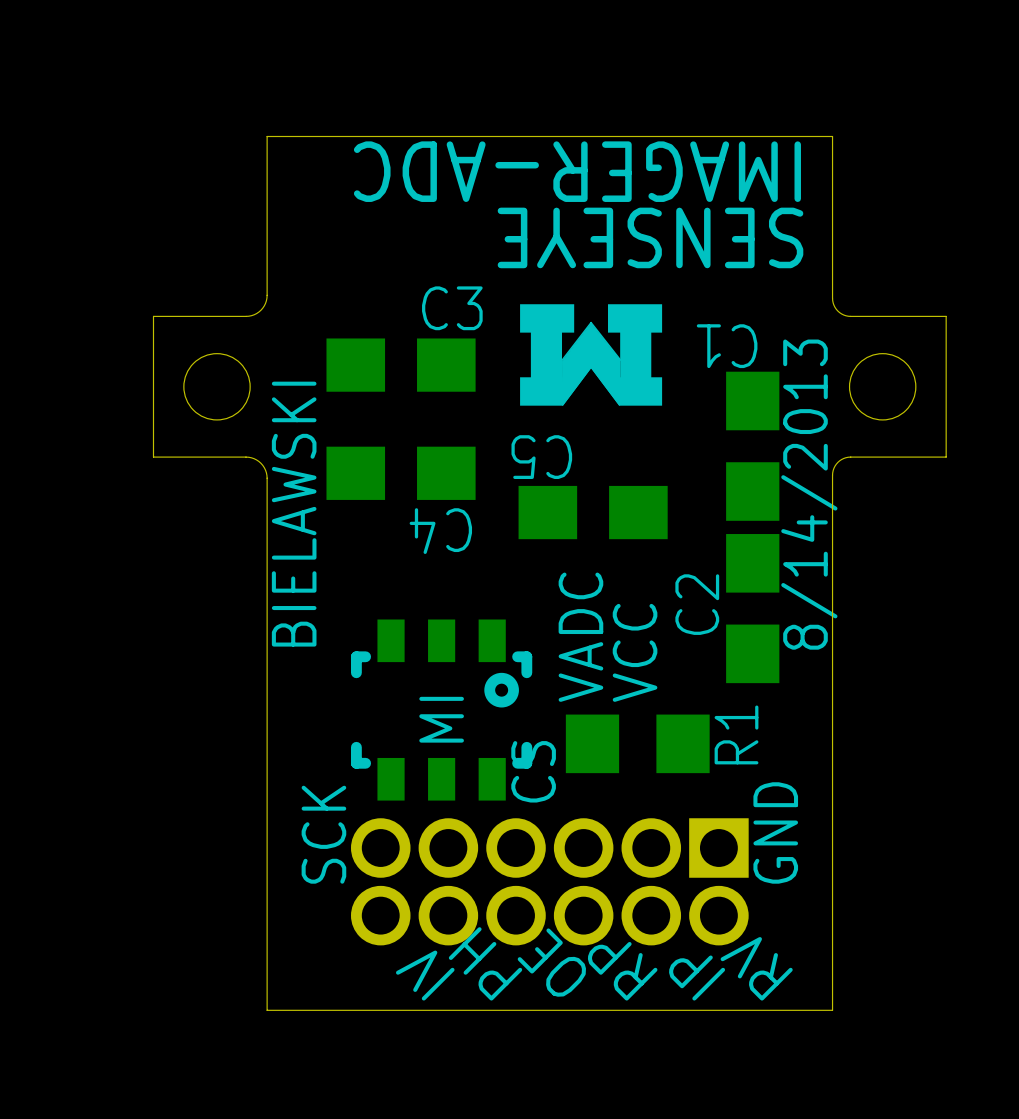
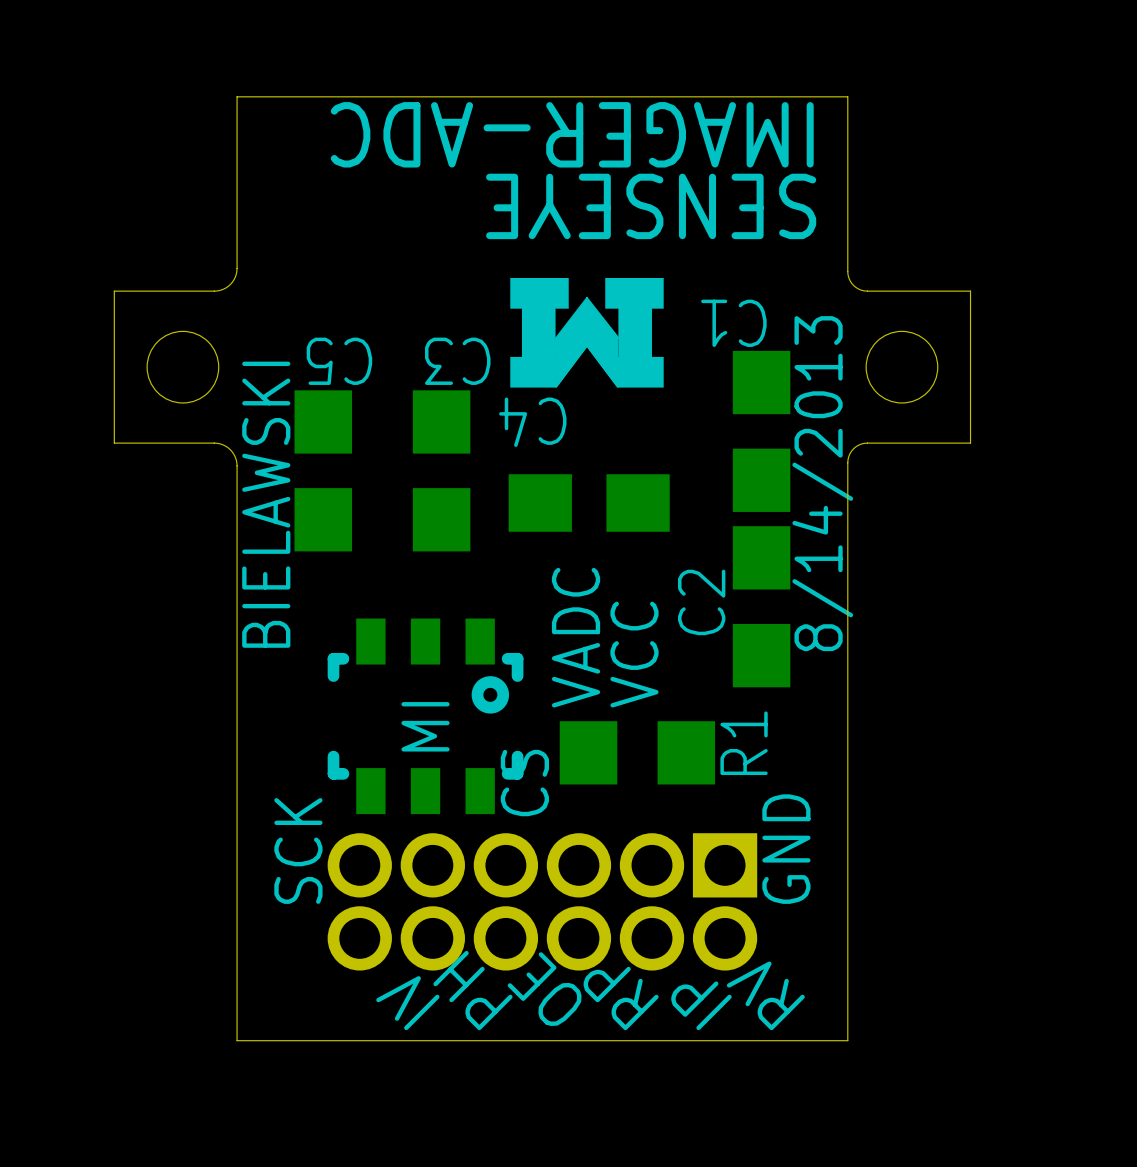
C3 rotation: 0° (401, 365) -> 90° clockwise (441, 470)
C3 position: (401, 365) -> (441, 470)
C5 name: C5 (541, 457) -> C4 (532, 422)
C4: (401, 473) -> none
C5: none -> (323, 470)

